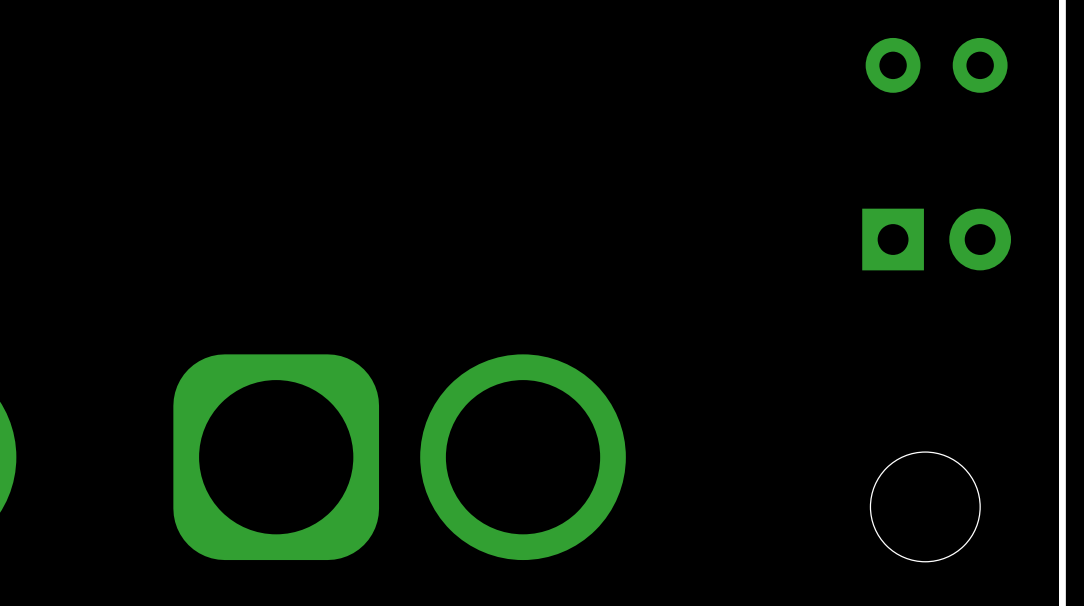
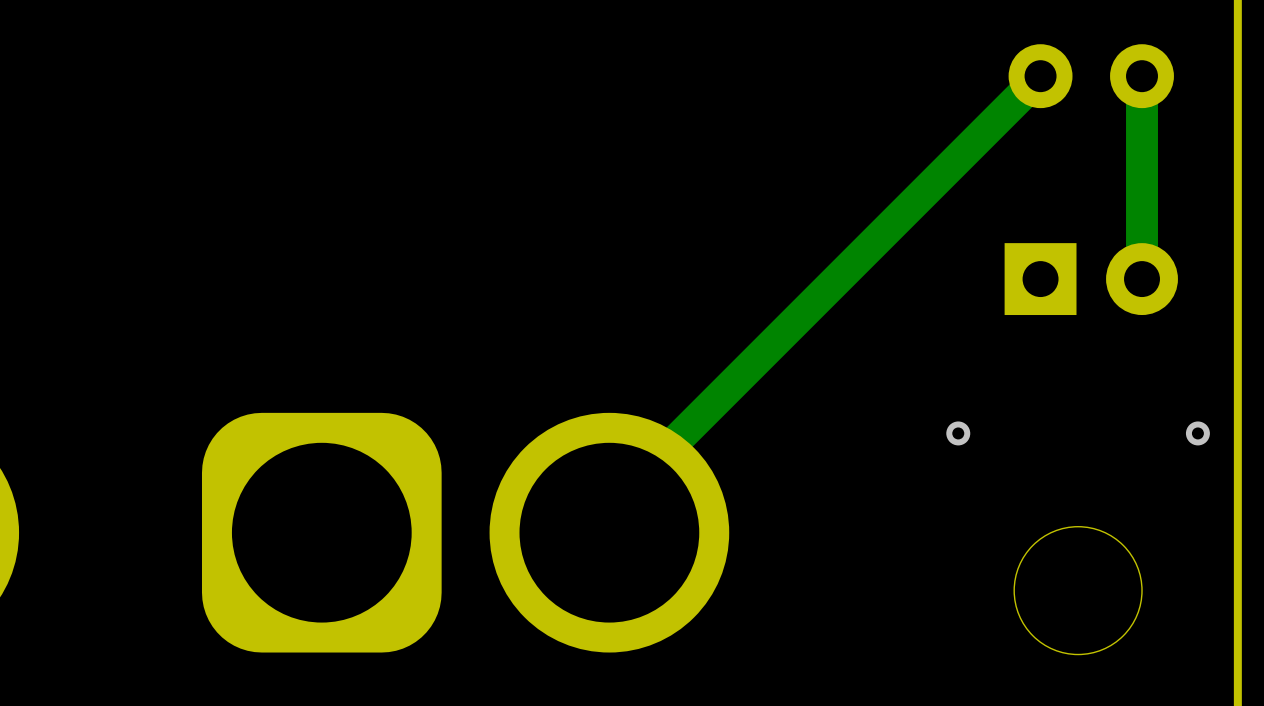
track: none -> (1040, 76) (609, 507) (609, 532)
track: none -> (1142, 76) (1142, 279)
via: none -> (958, 433)
via: none -> (1197, 433)

